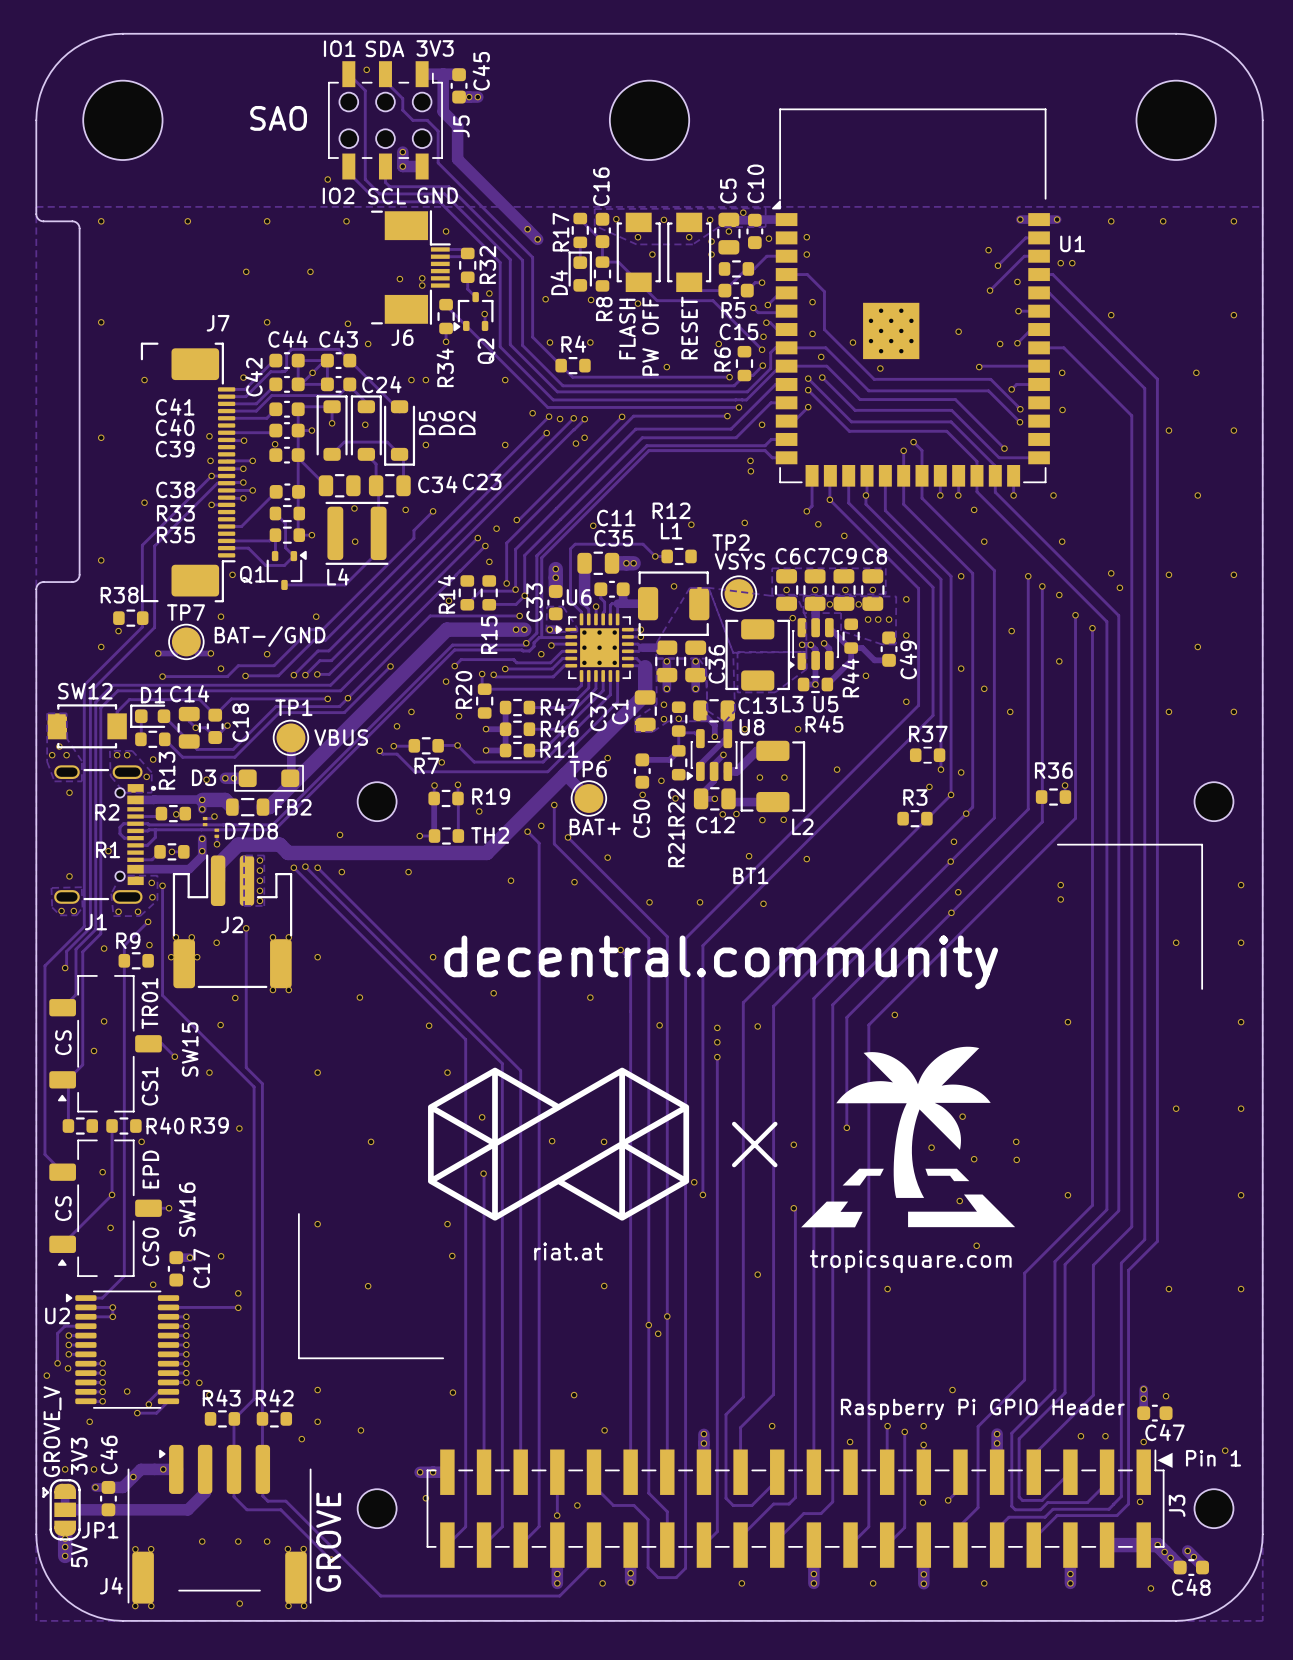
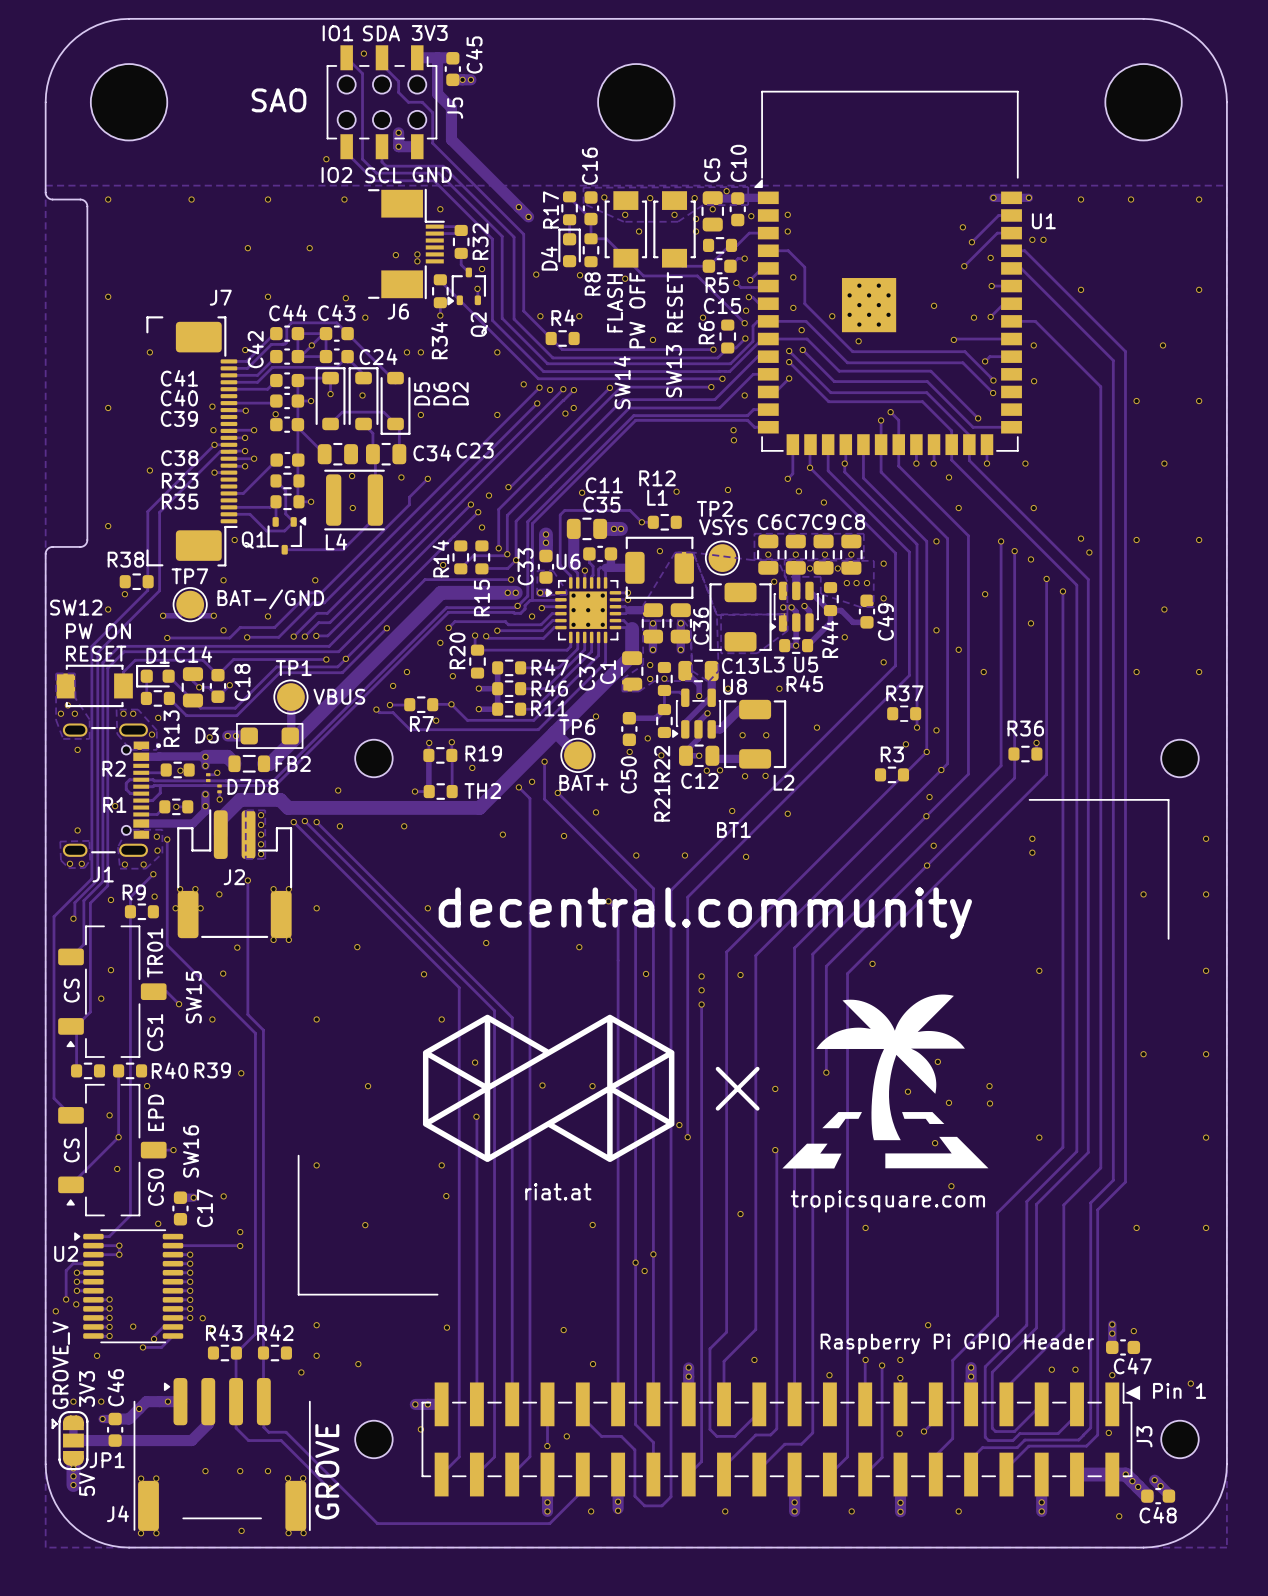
SW13 name: none -> SW13 (673, 371)
SW14 name: none -> SW14 (622, 382)
text: none -> PW ON (98, 631)
SW12 name position: SW12 (85, 691) -> SW12 (76, 607)
text: none -> RESET (96, 653)

